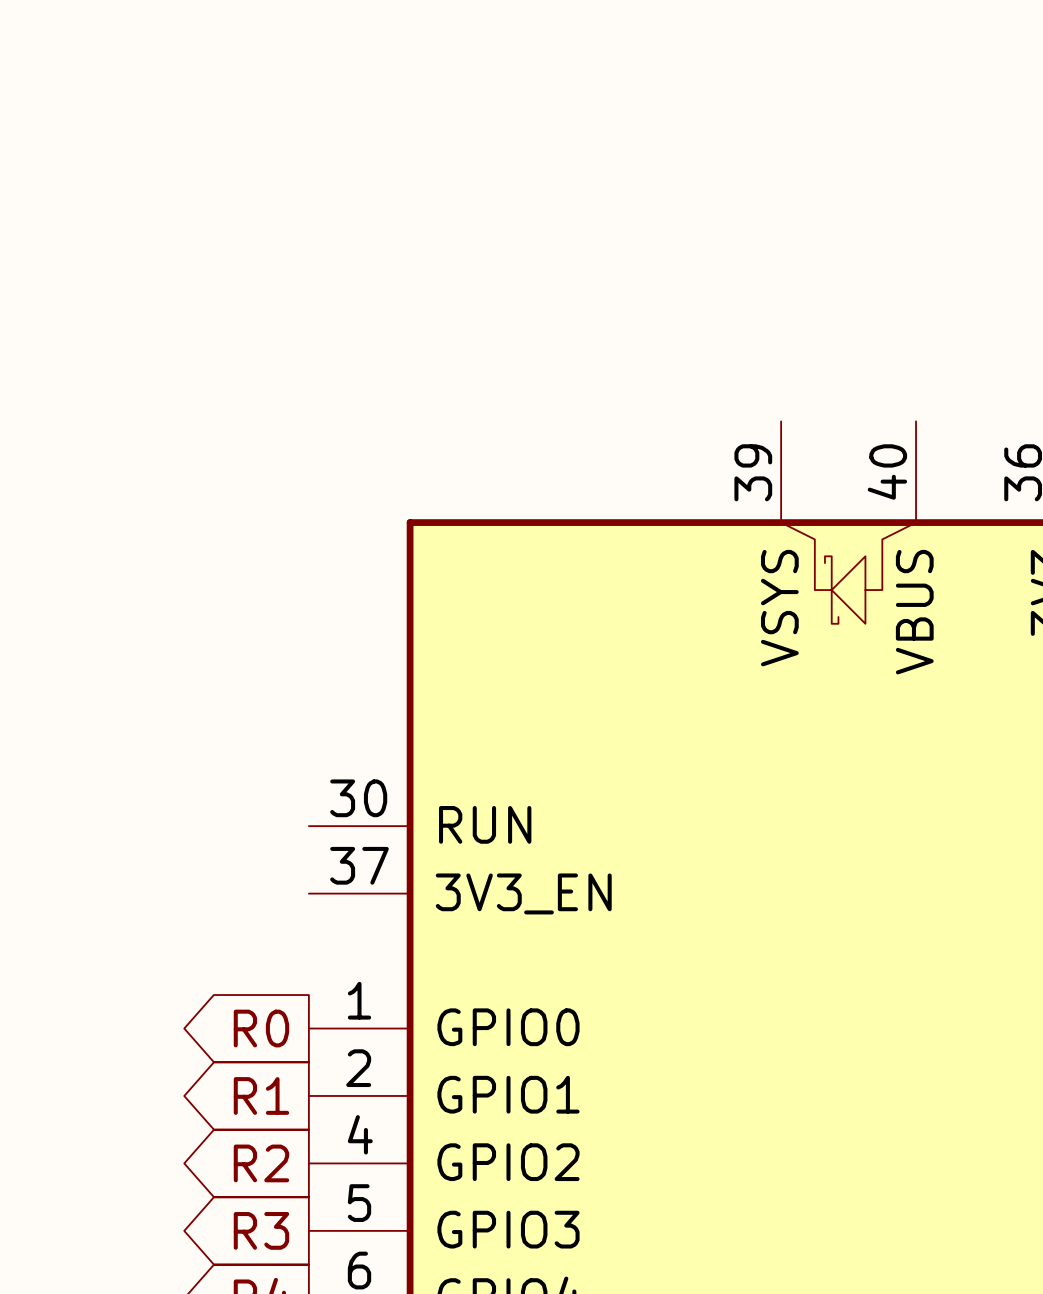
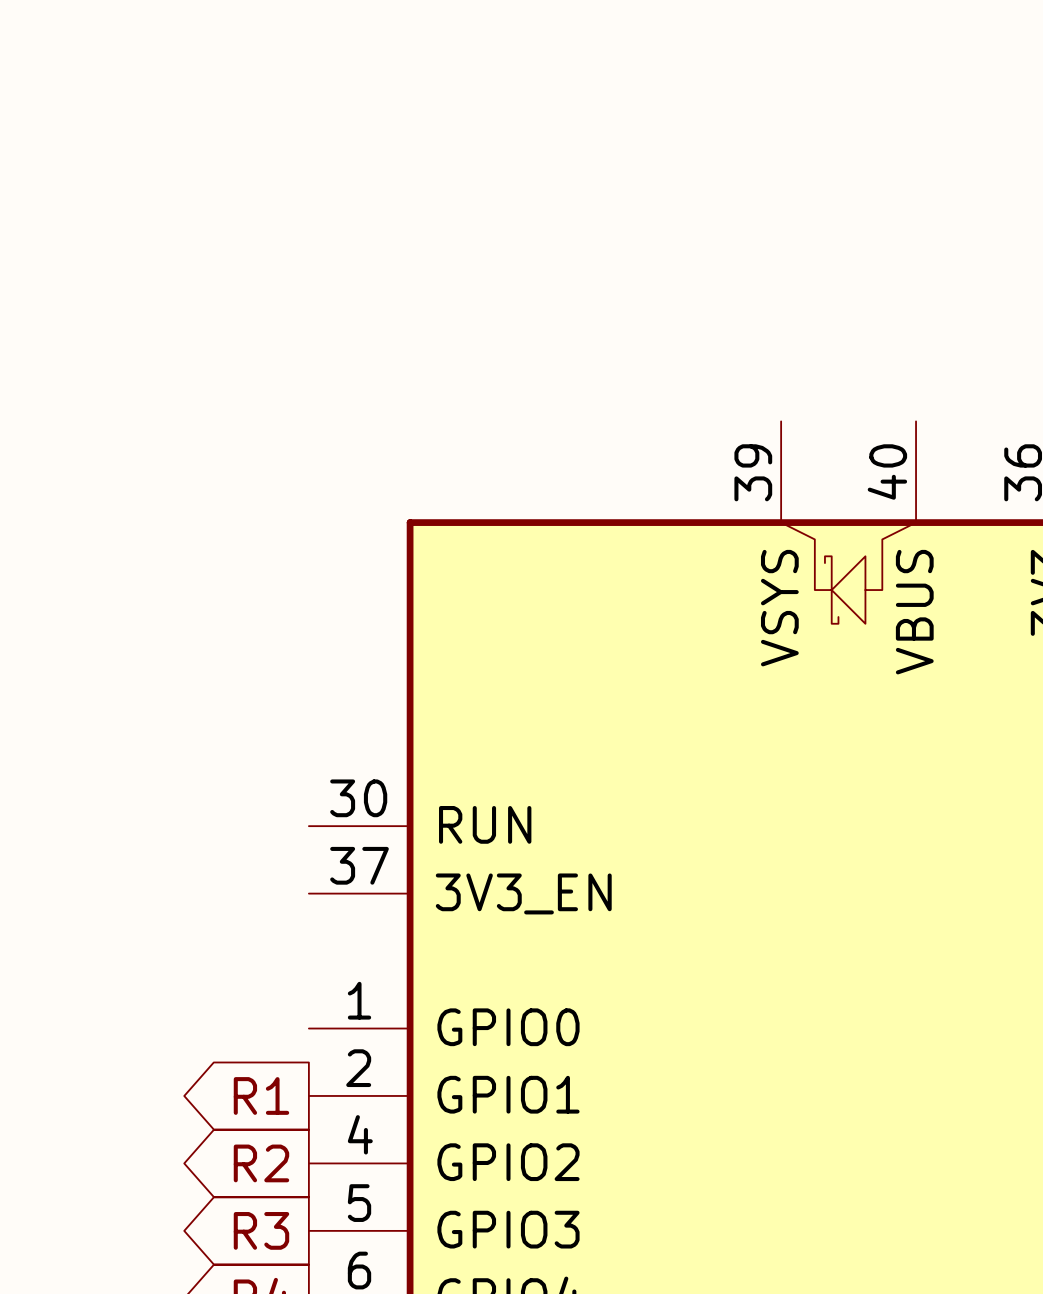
global label: R0 (261, 1028) -> none

